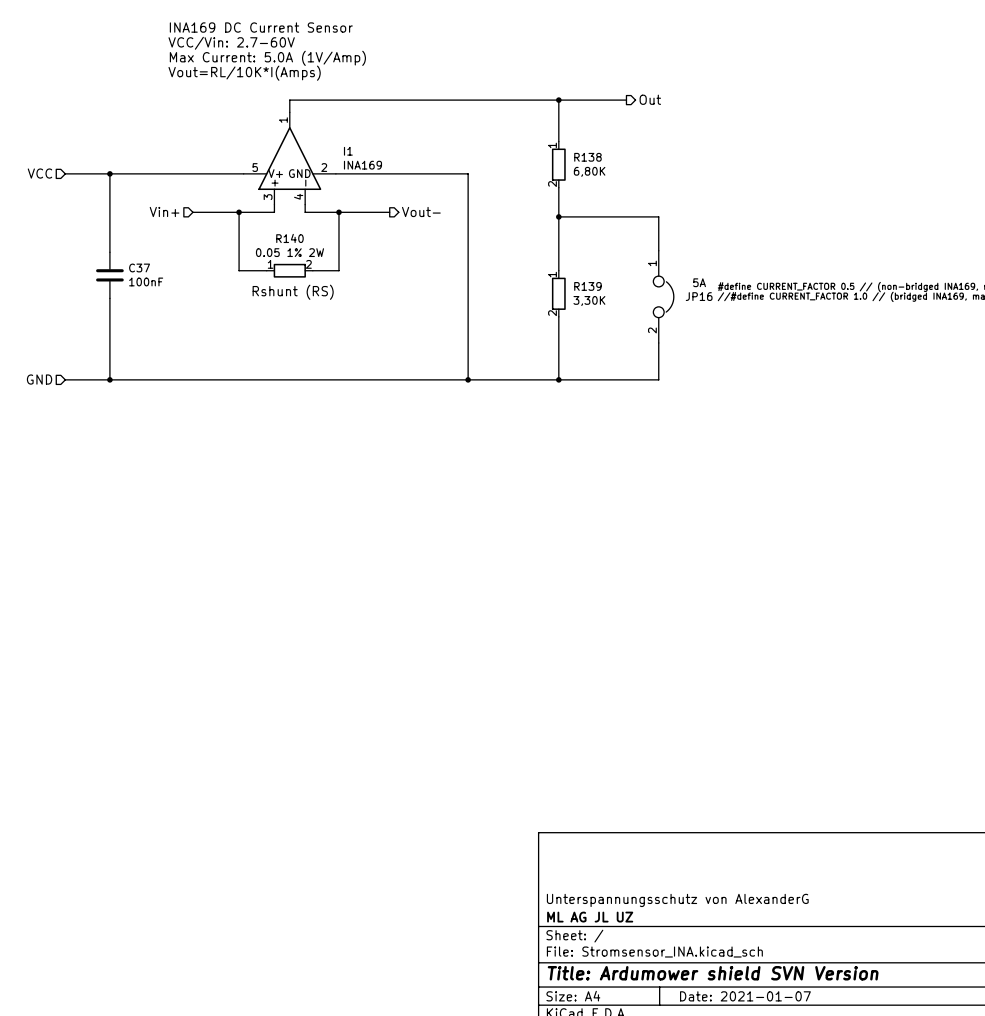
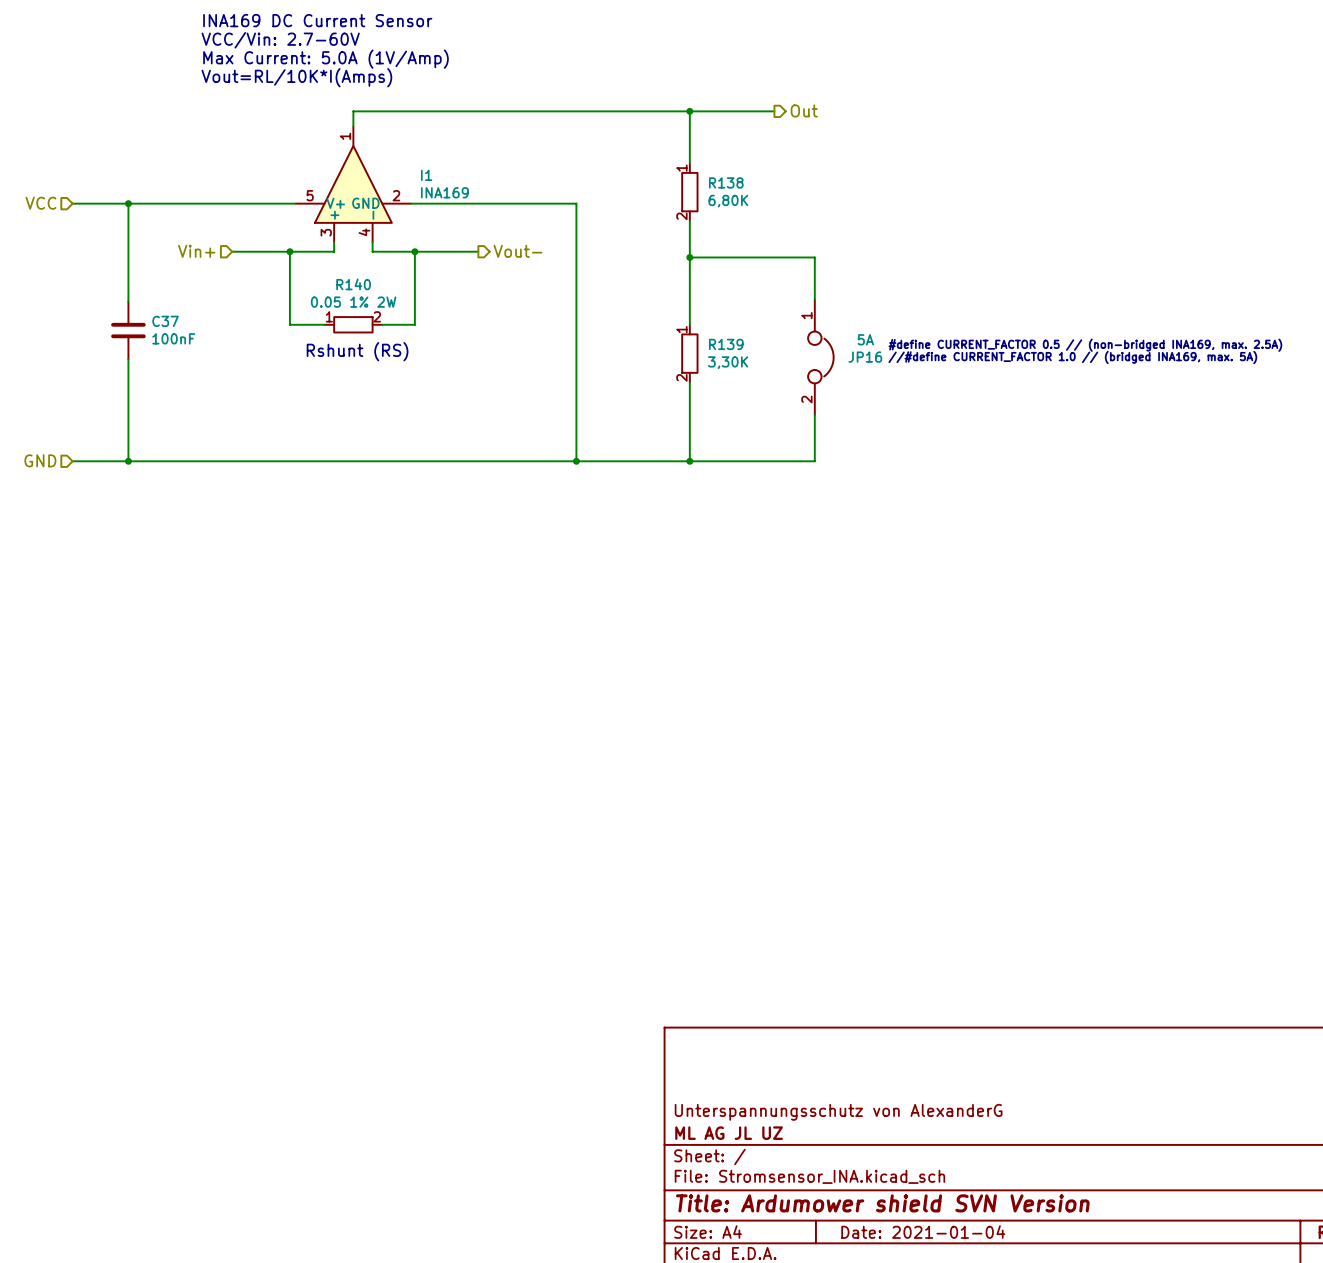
title block: Date: 2021-01-07 (745, 996) -> Date: 2021-01-04 (923, 1232)

